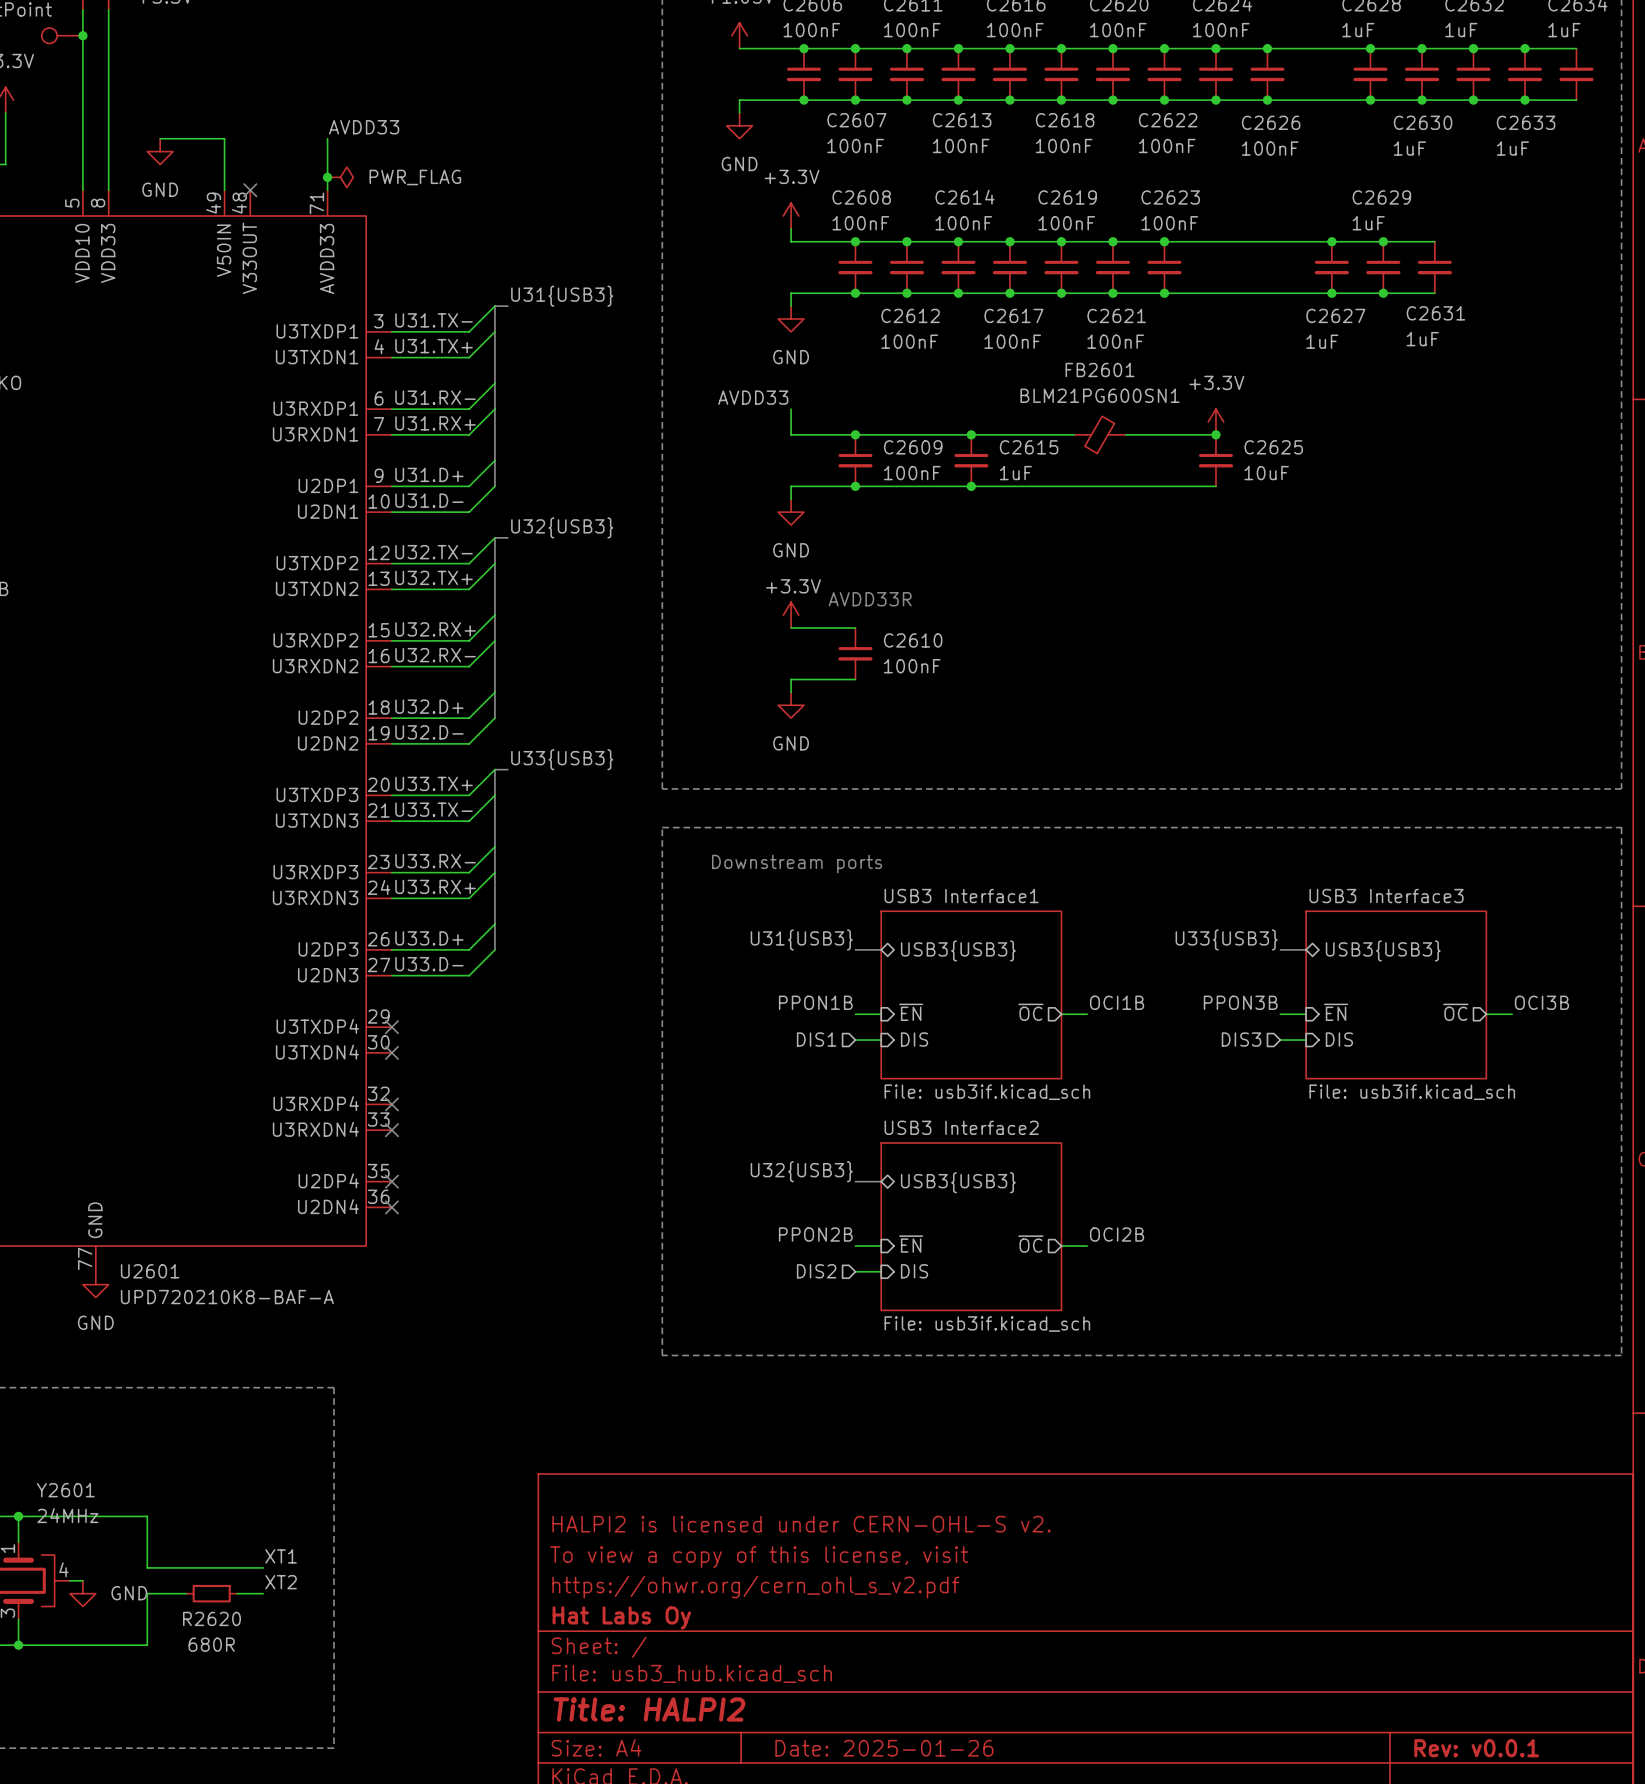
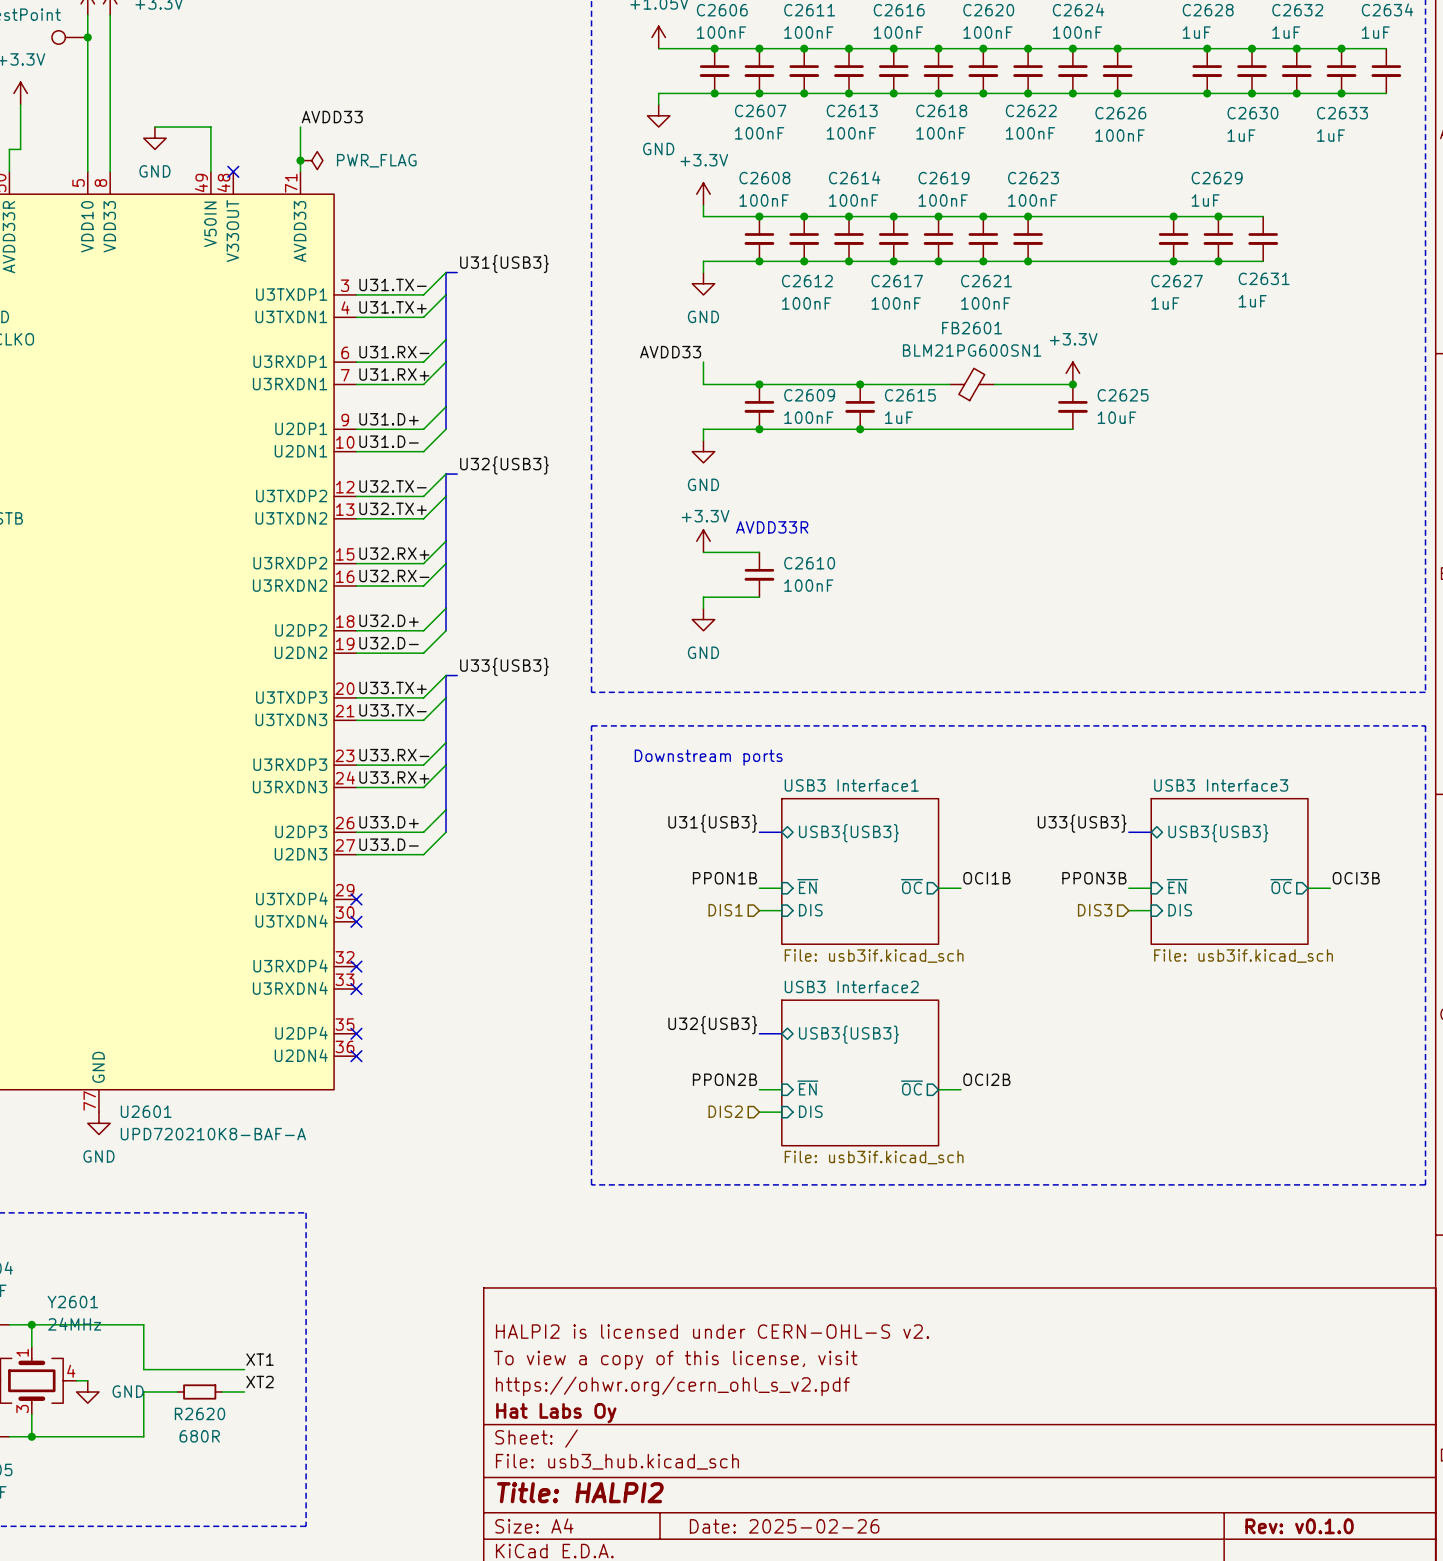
title block: Date: 2025-01-26 (884, 1748) -> Date: 2025-02-26 (784, 1526)
title block: Rev: v0.0.1 (1476, 1748) -> Rev: v0.1.0 (1299, 1526)

